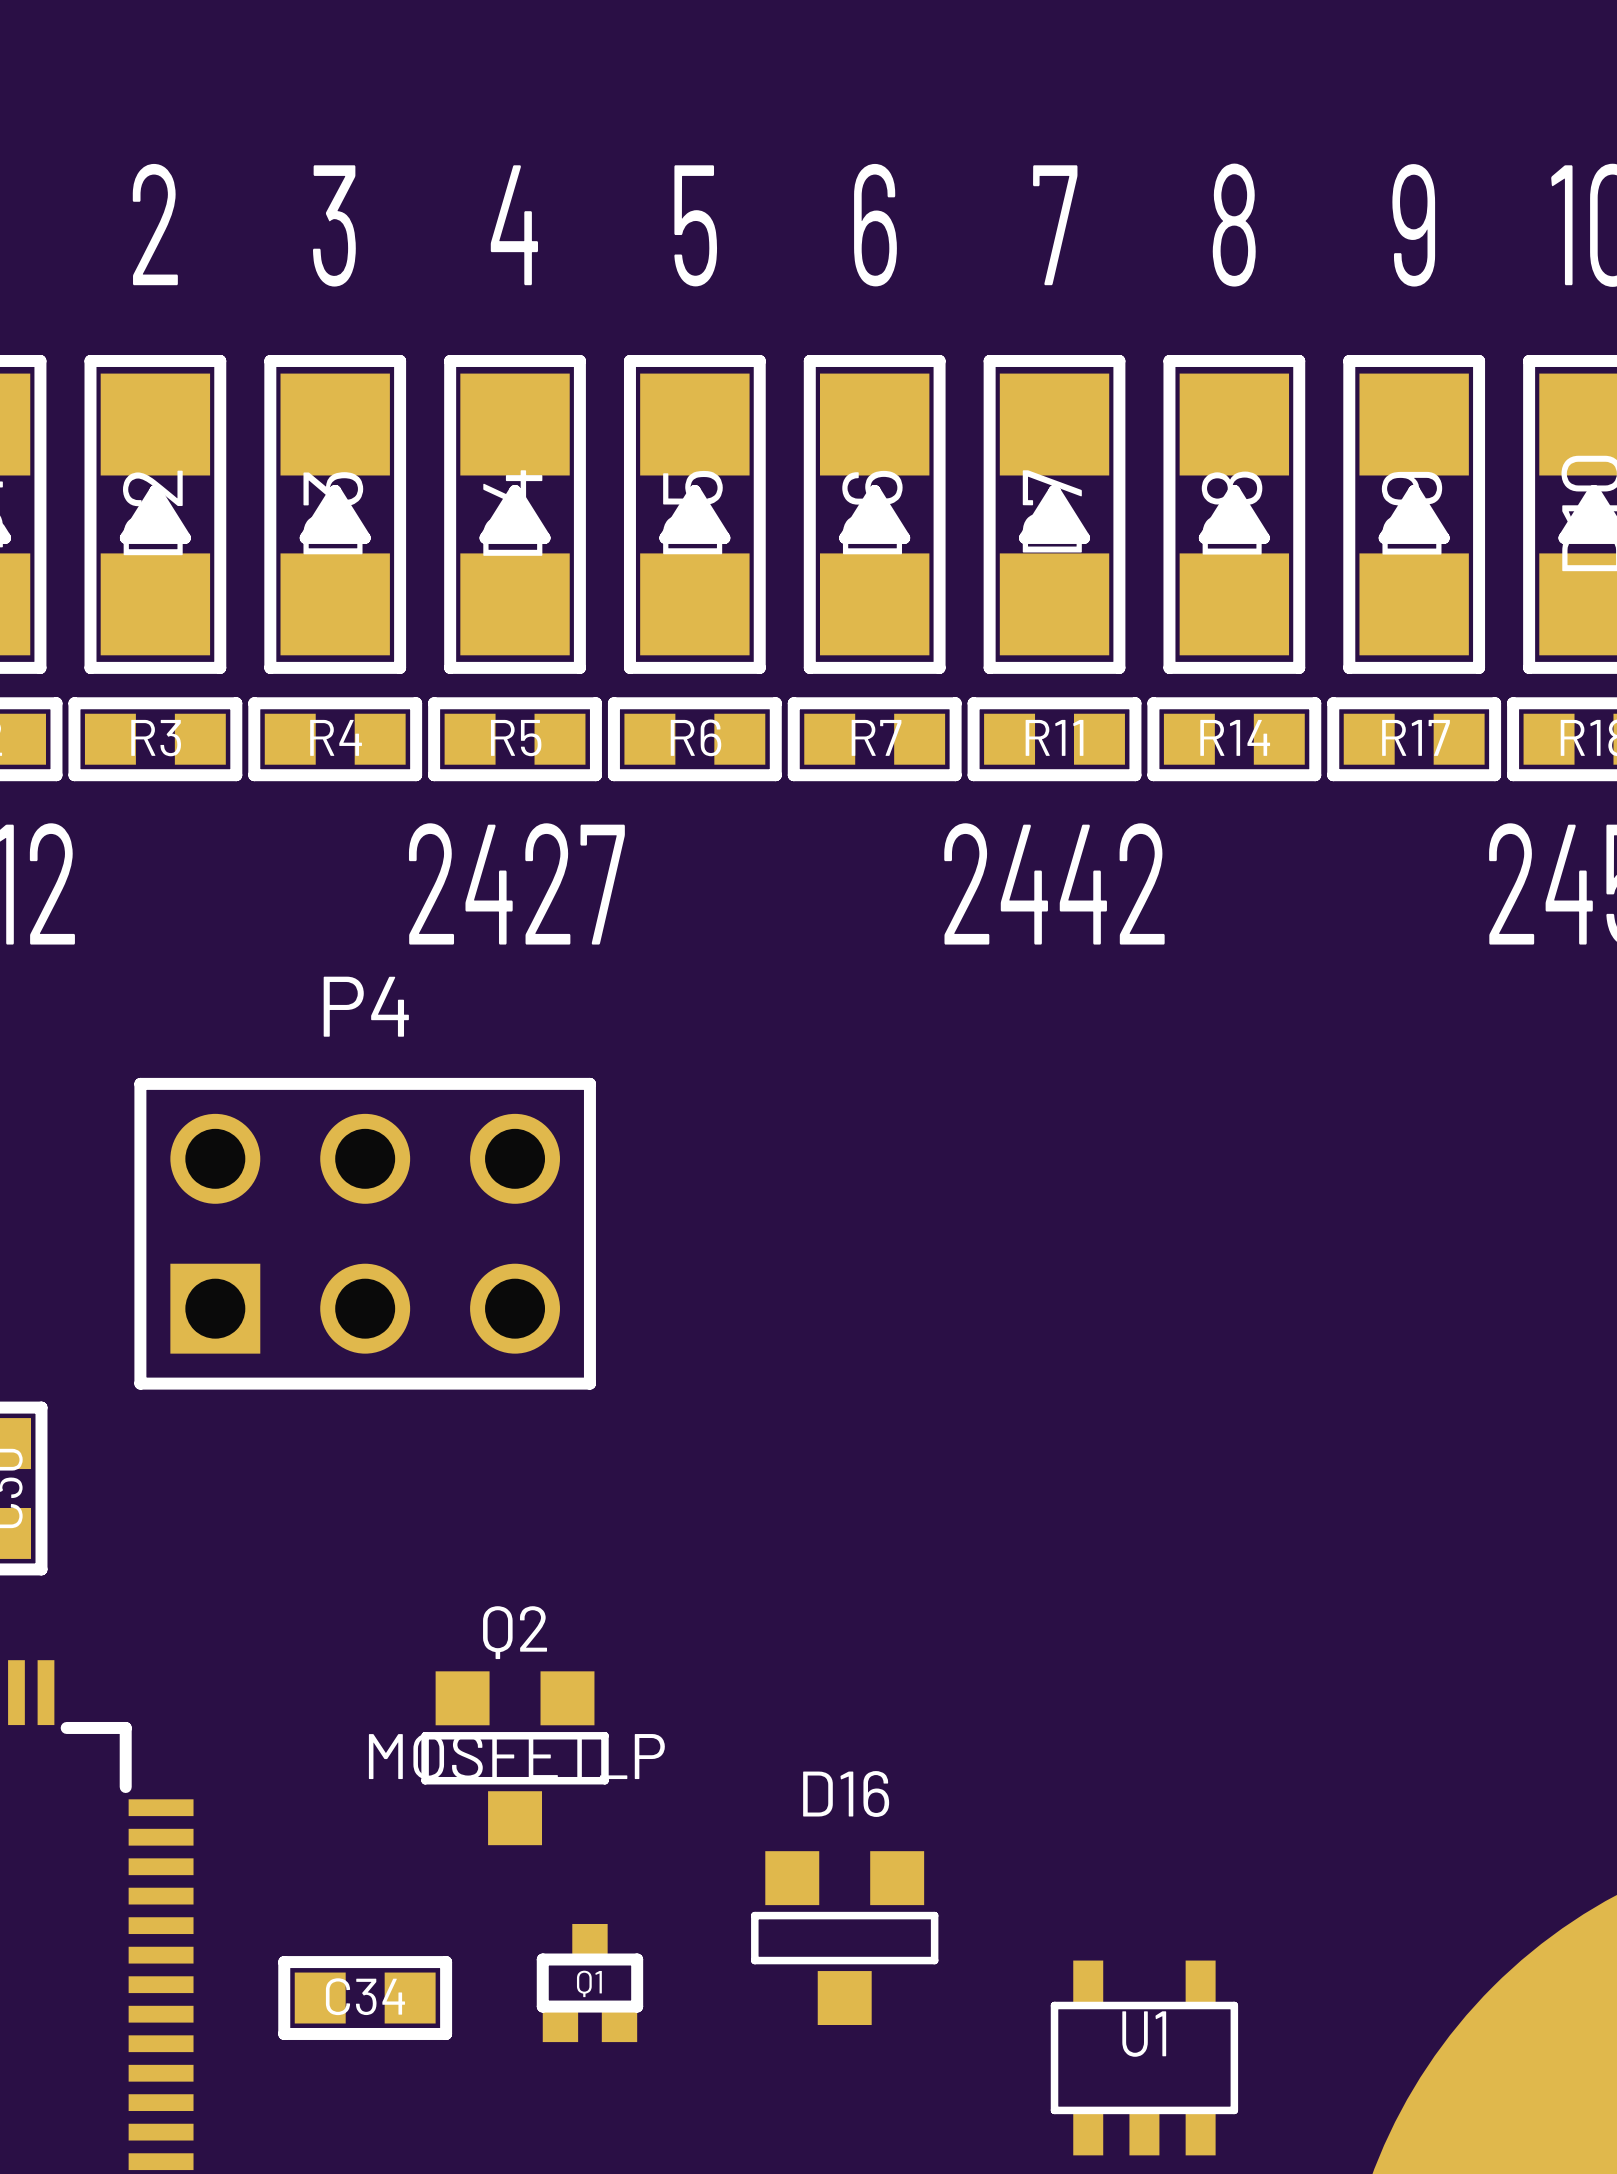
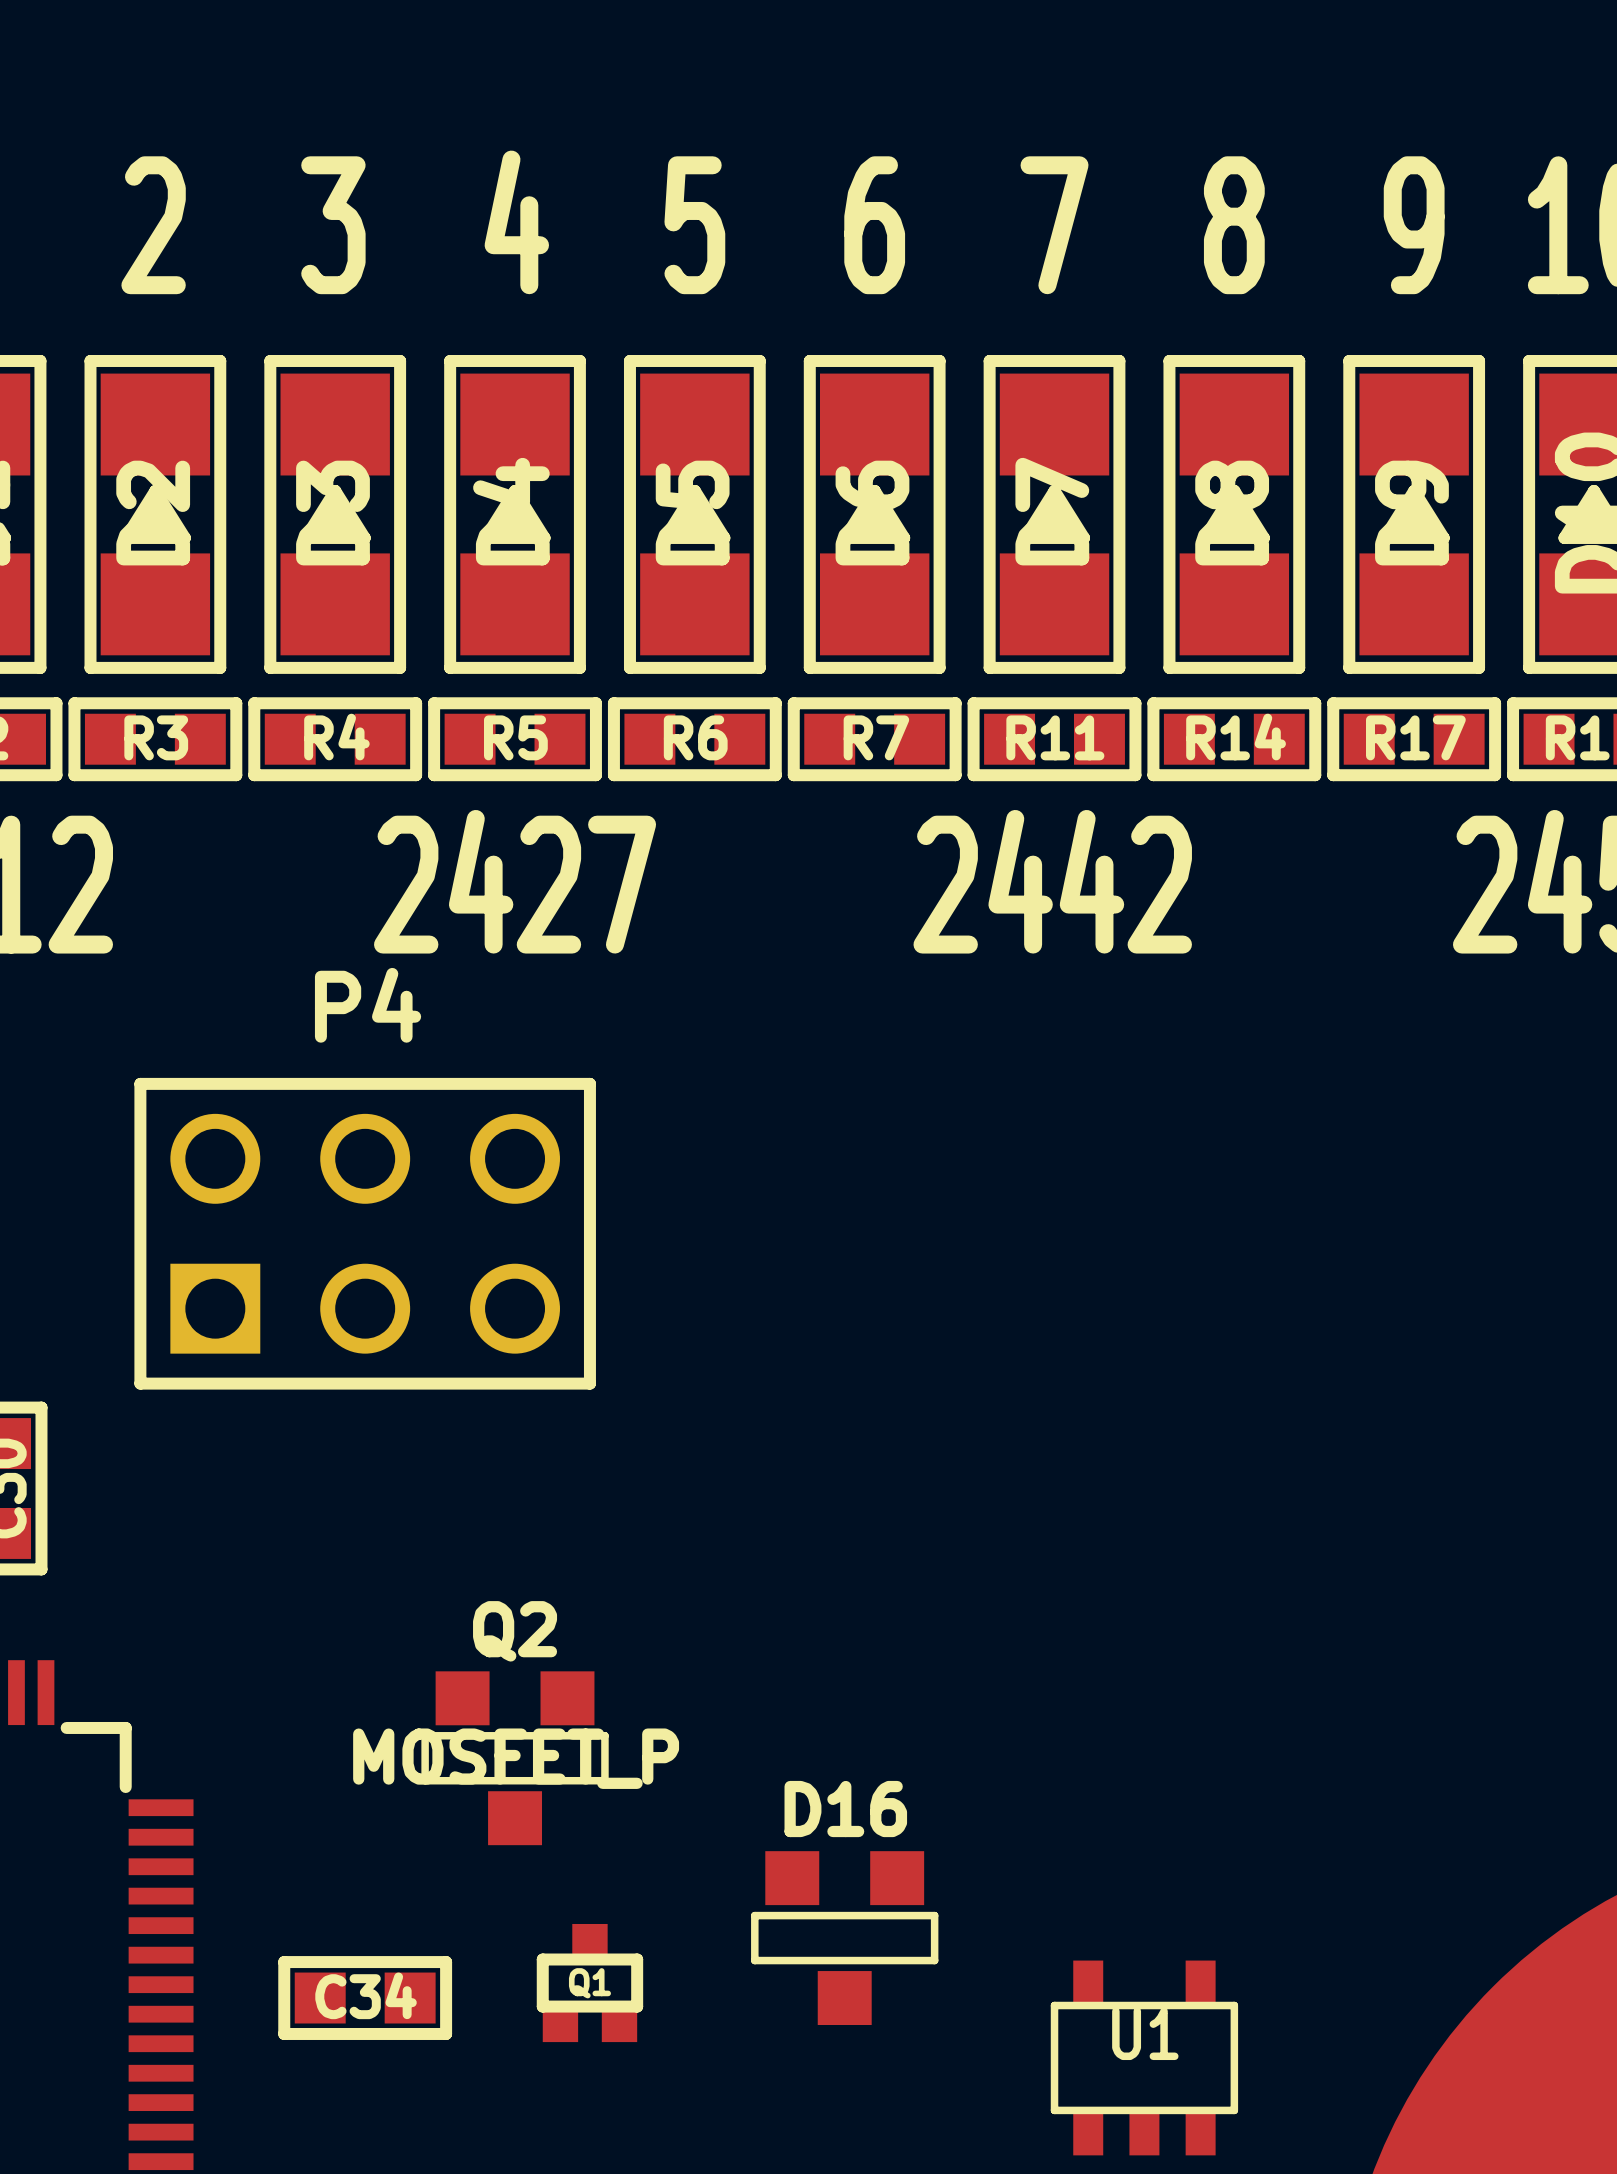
D16 name position: D16 (846, 1794) -> D16 (845, 1809)

